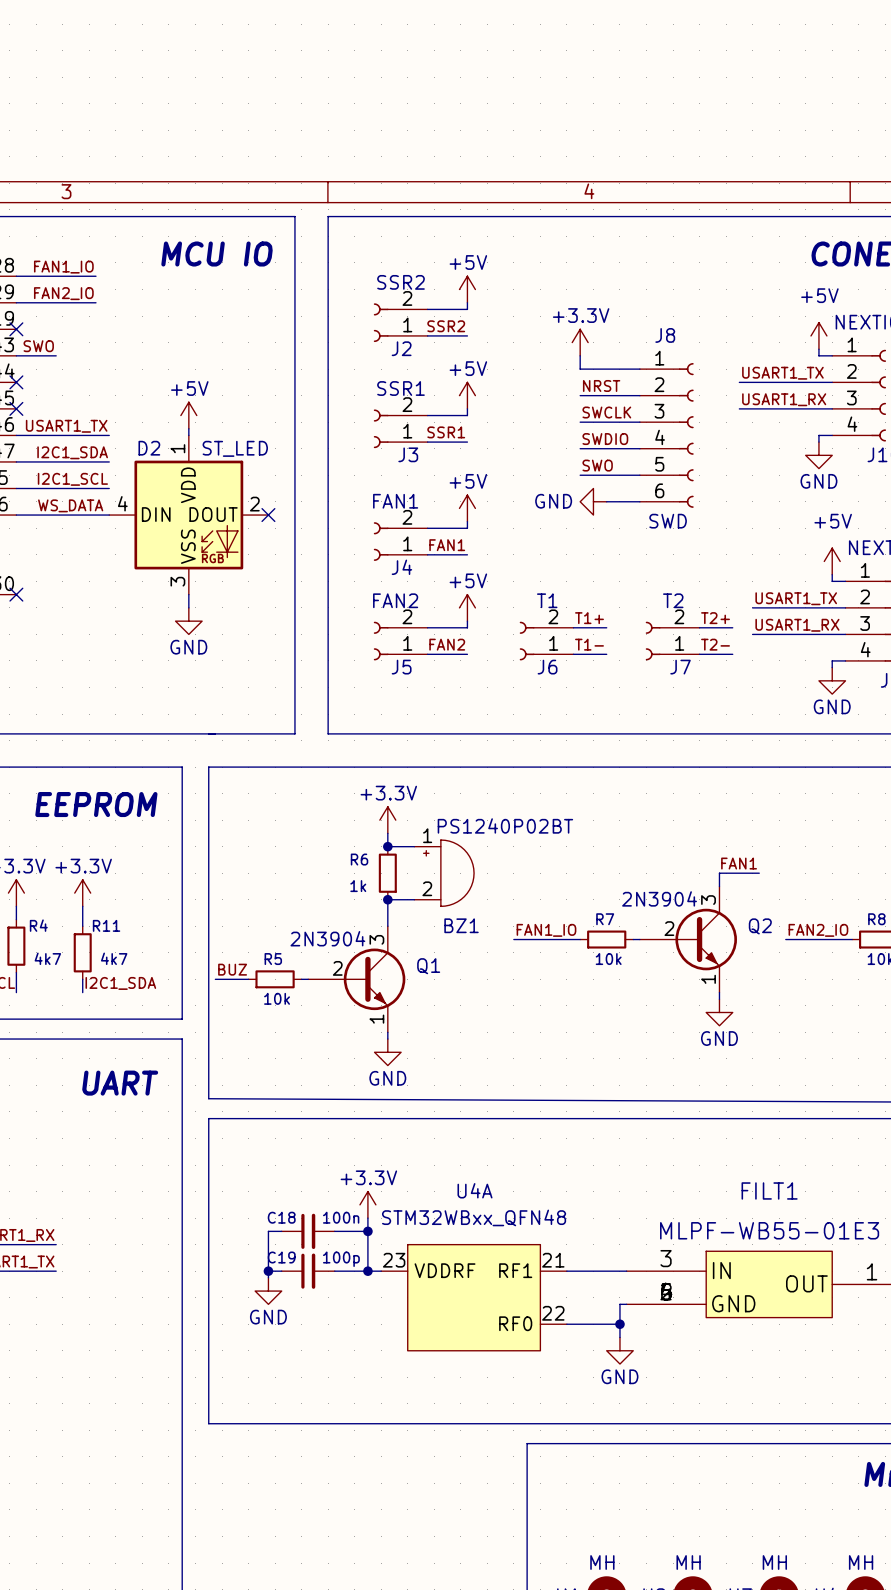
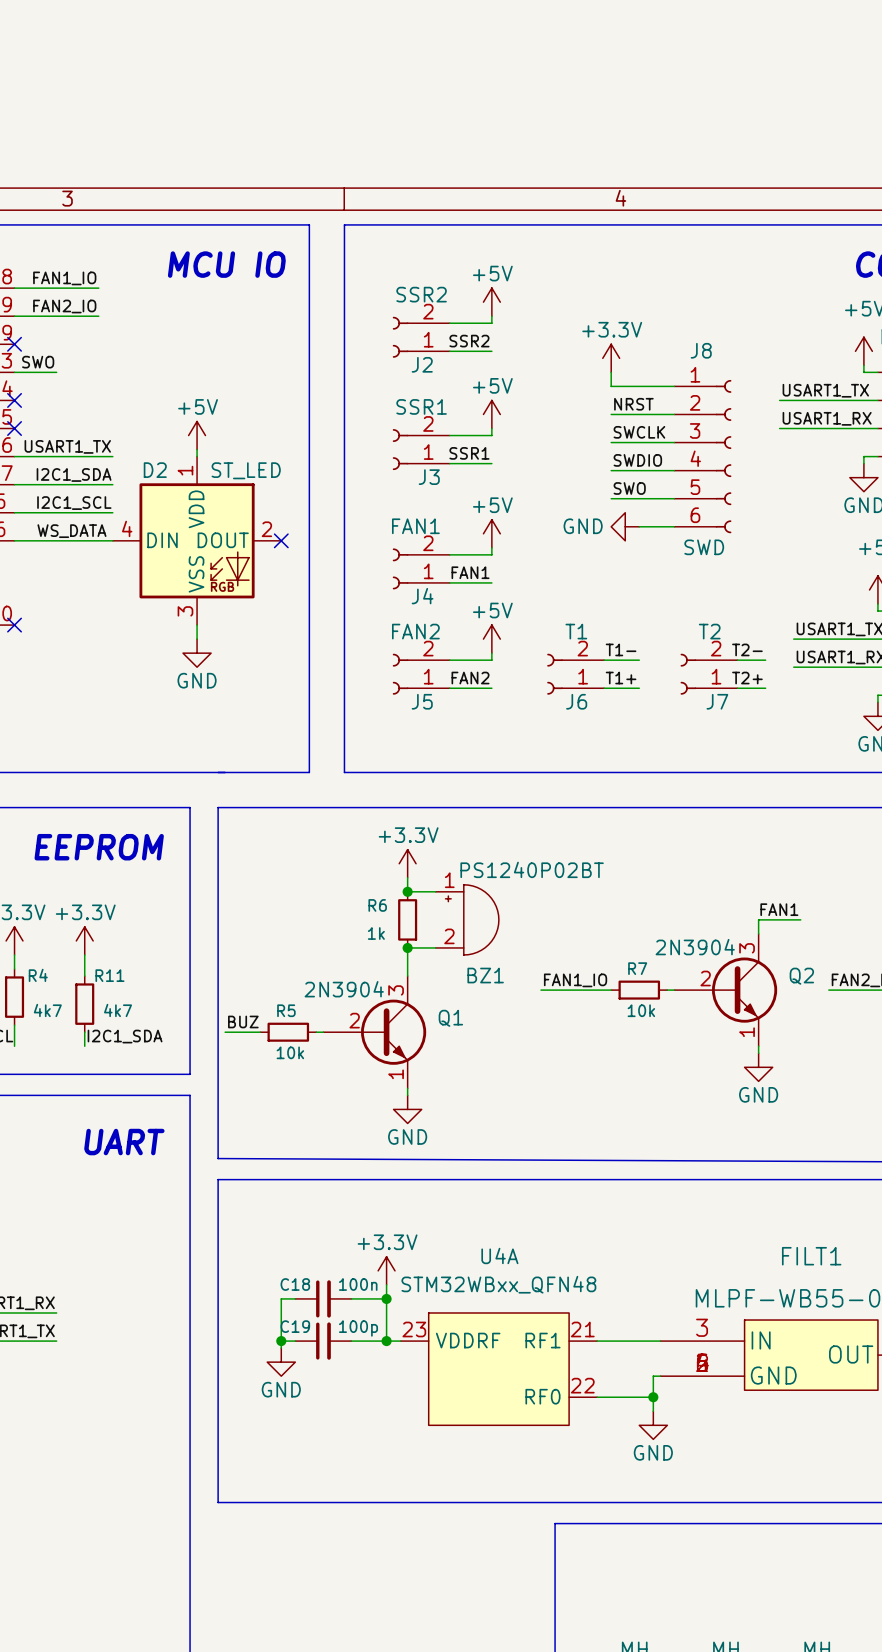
label: T1+ (589, 618) -> T1- (621, 649)
label: T2+ (715, 618) -> T2- (747, 649)
wire: (726, 627) (732, 627) -> none
label: T1- (589, 644) -> T1+ (621, 678)
label: T2- (715, 644) -> T2+ (747, 678)
wire: (726, 654) (732, 654) -> none

